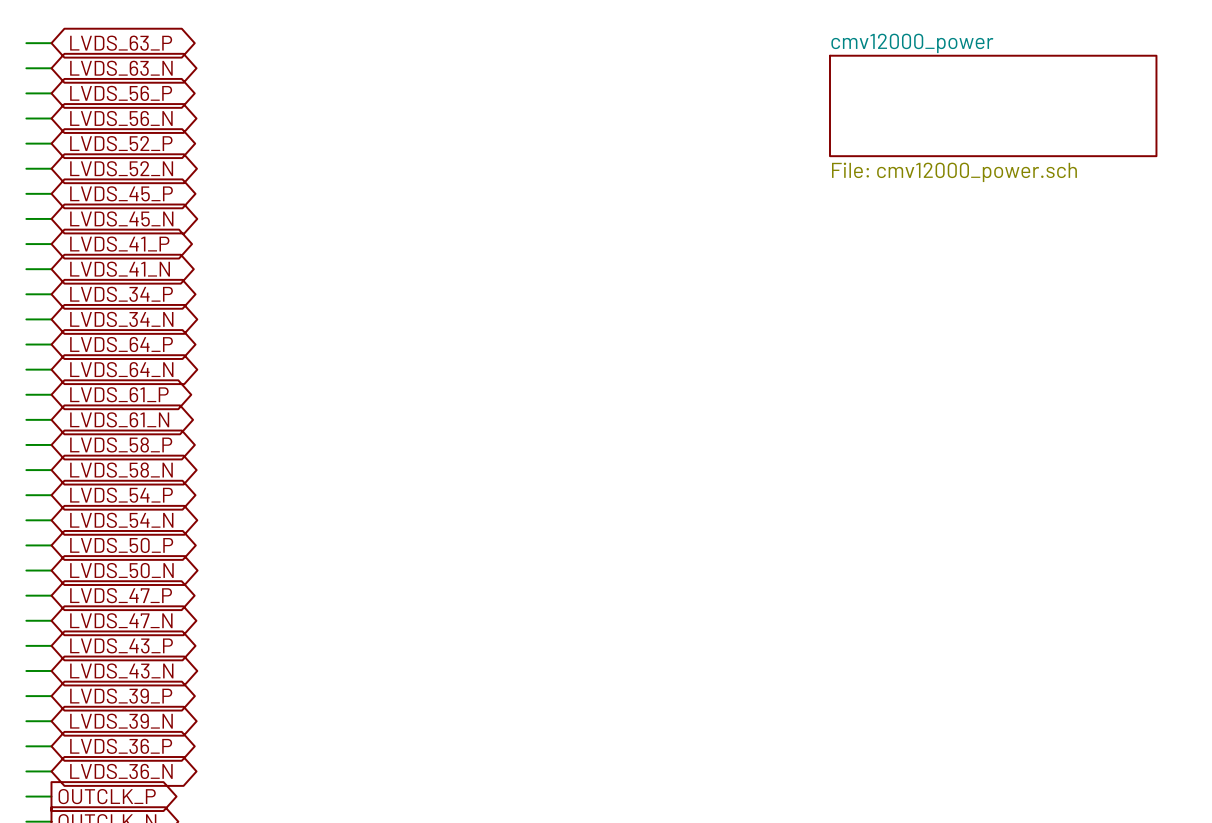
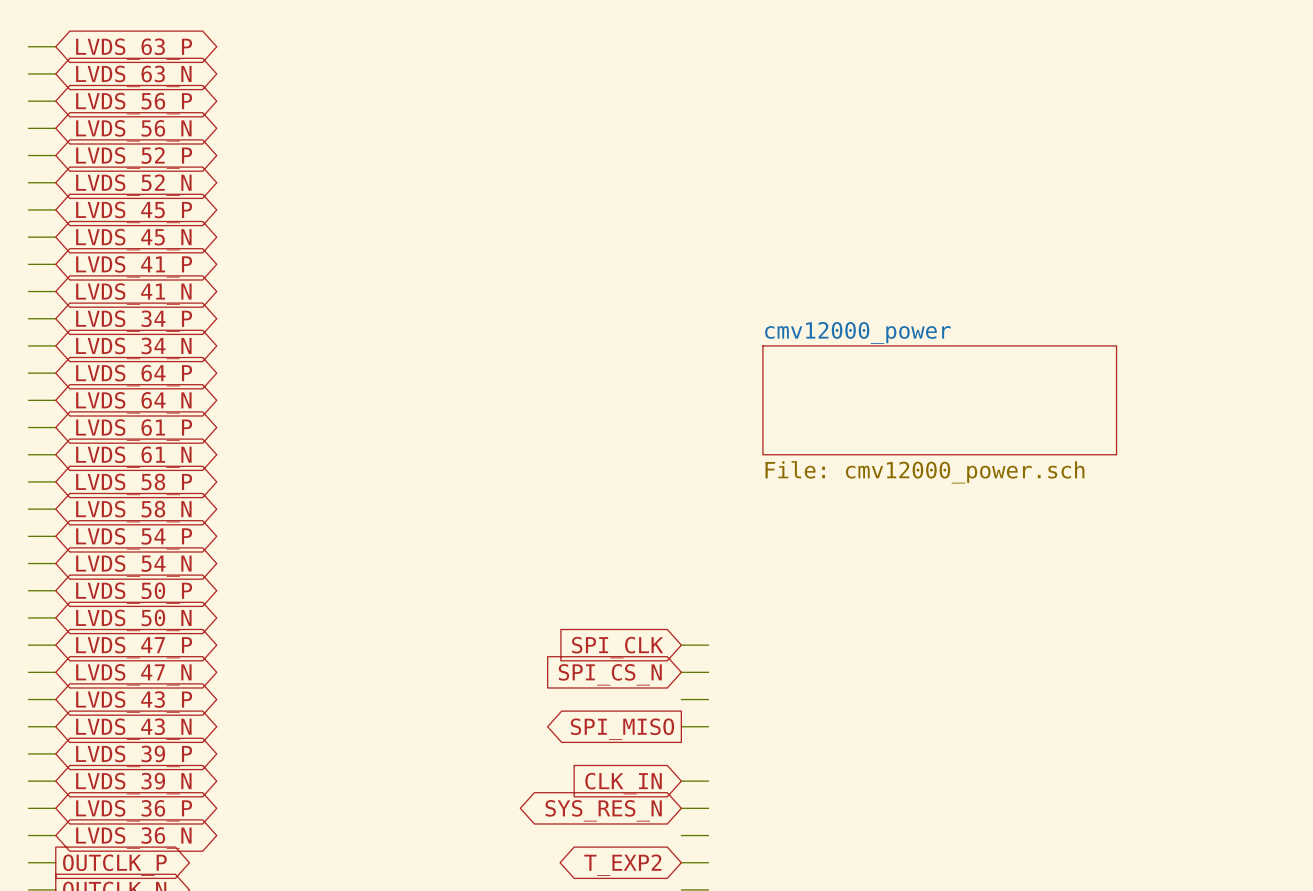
sheet cmv12000_power position: (993, 105) -> (939, 400)
global label: none -> SPI_CLK (617, 647)
wire: none -> (681, 645) (708, 645)
global label: none -> SPI_CS_N (610, 674)
wire: none -> (681, 672) (708, 672)
wire: none -> (681, 699) (708, 699)
global label: none -> SPI_MISO (622, 729)
wire: none -> (681, 726) (708, 726)
global label: none -> CLK_IN (623, 783)
wire: none -> (681, 781) (708, 781)
global label: none -> SYS_RES_N (603, 810)
wire: none -> (681, 808) (708, 808)
wire: none -> (681, 835) (708, 835)
global label: none -> T_EXP2 (622, 865)
wire: none -> (681, 862) (708, 862)
wire: none -> (681, 889) (708, 889)

